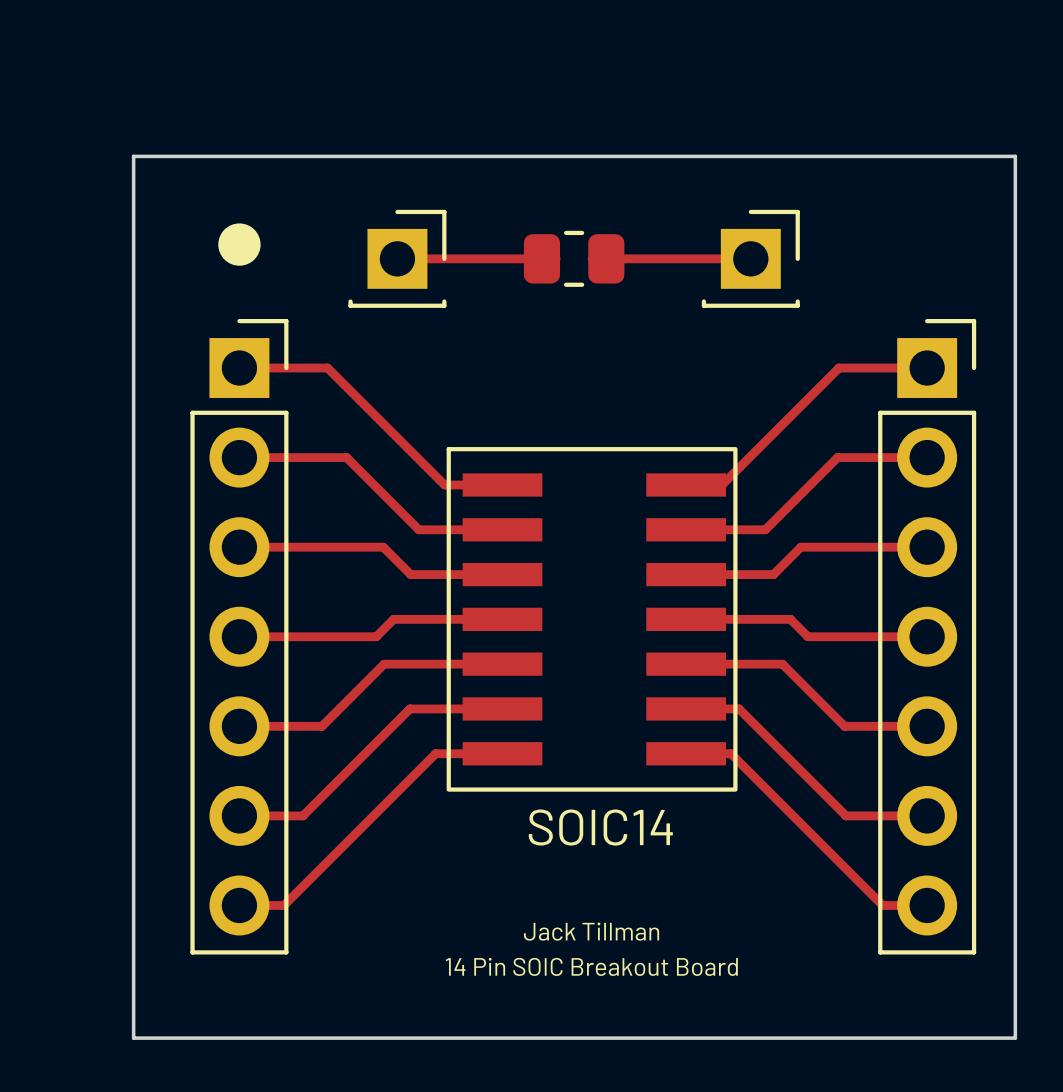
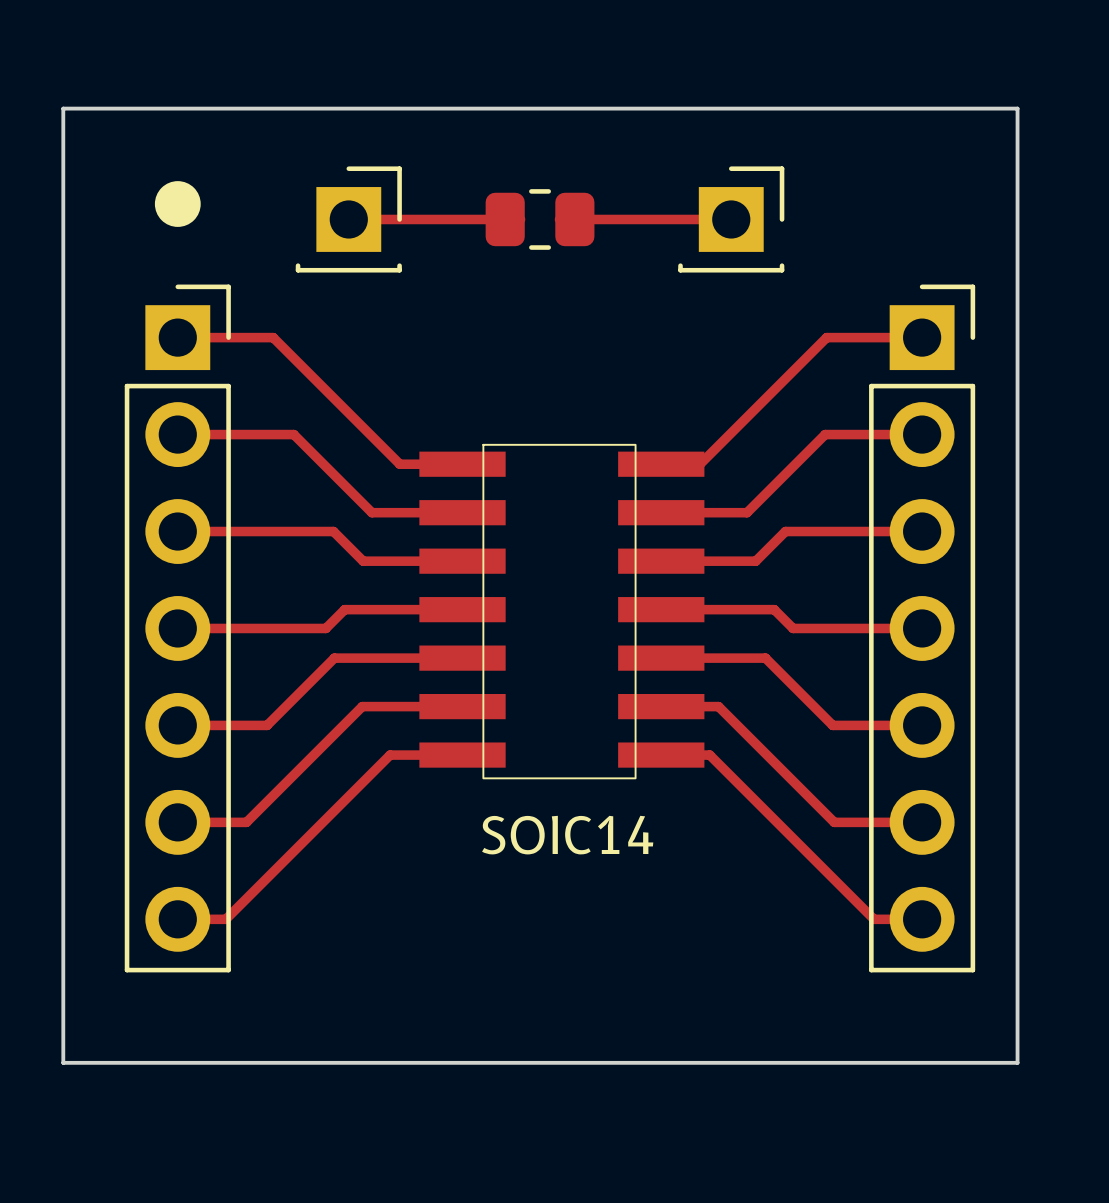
SOIC14 footprint: [446, 447, 738, 792] -> [419, 443, 705, 780]
text: Jack Tillman (591, 931) -> none
text: 14 Pin SOIC Breakout Board (591, 966) -> none

